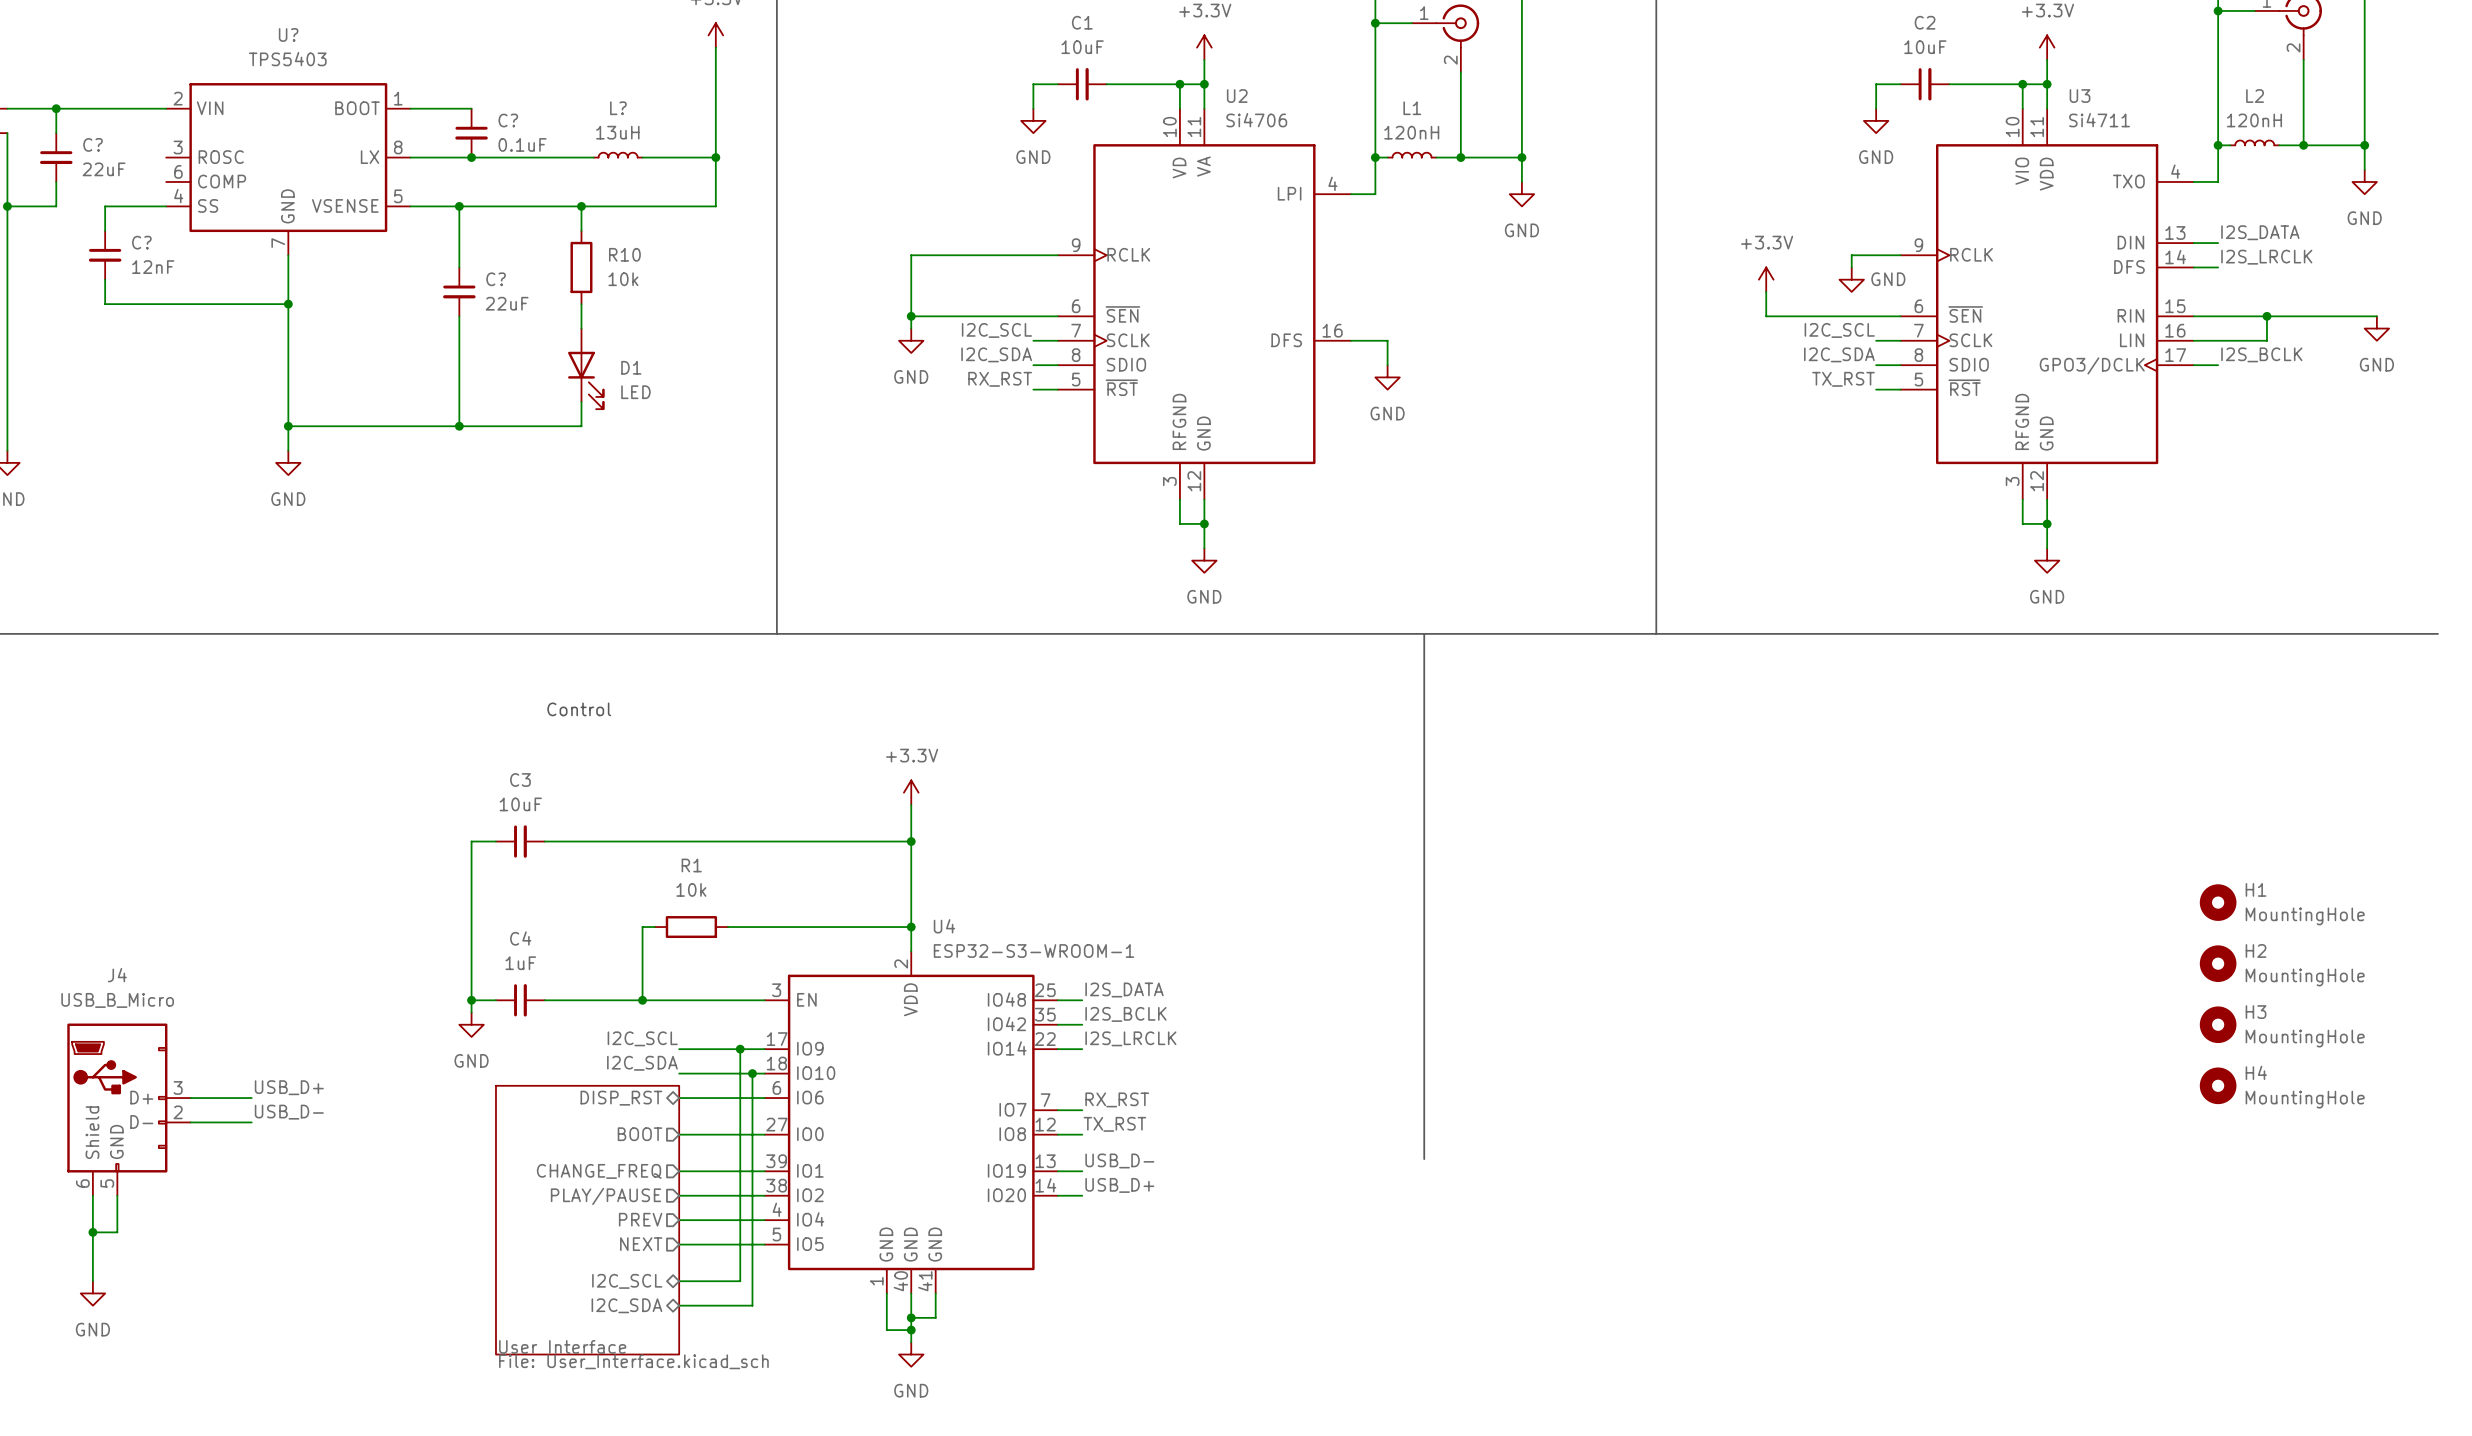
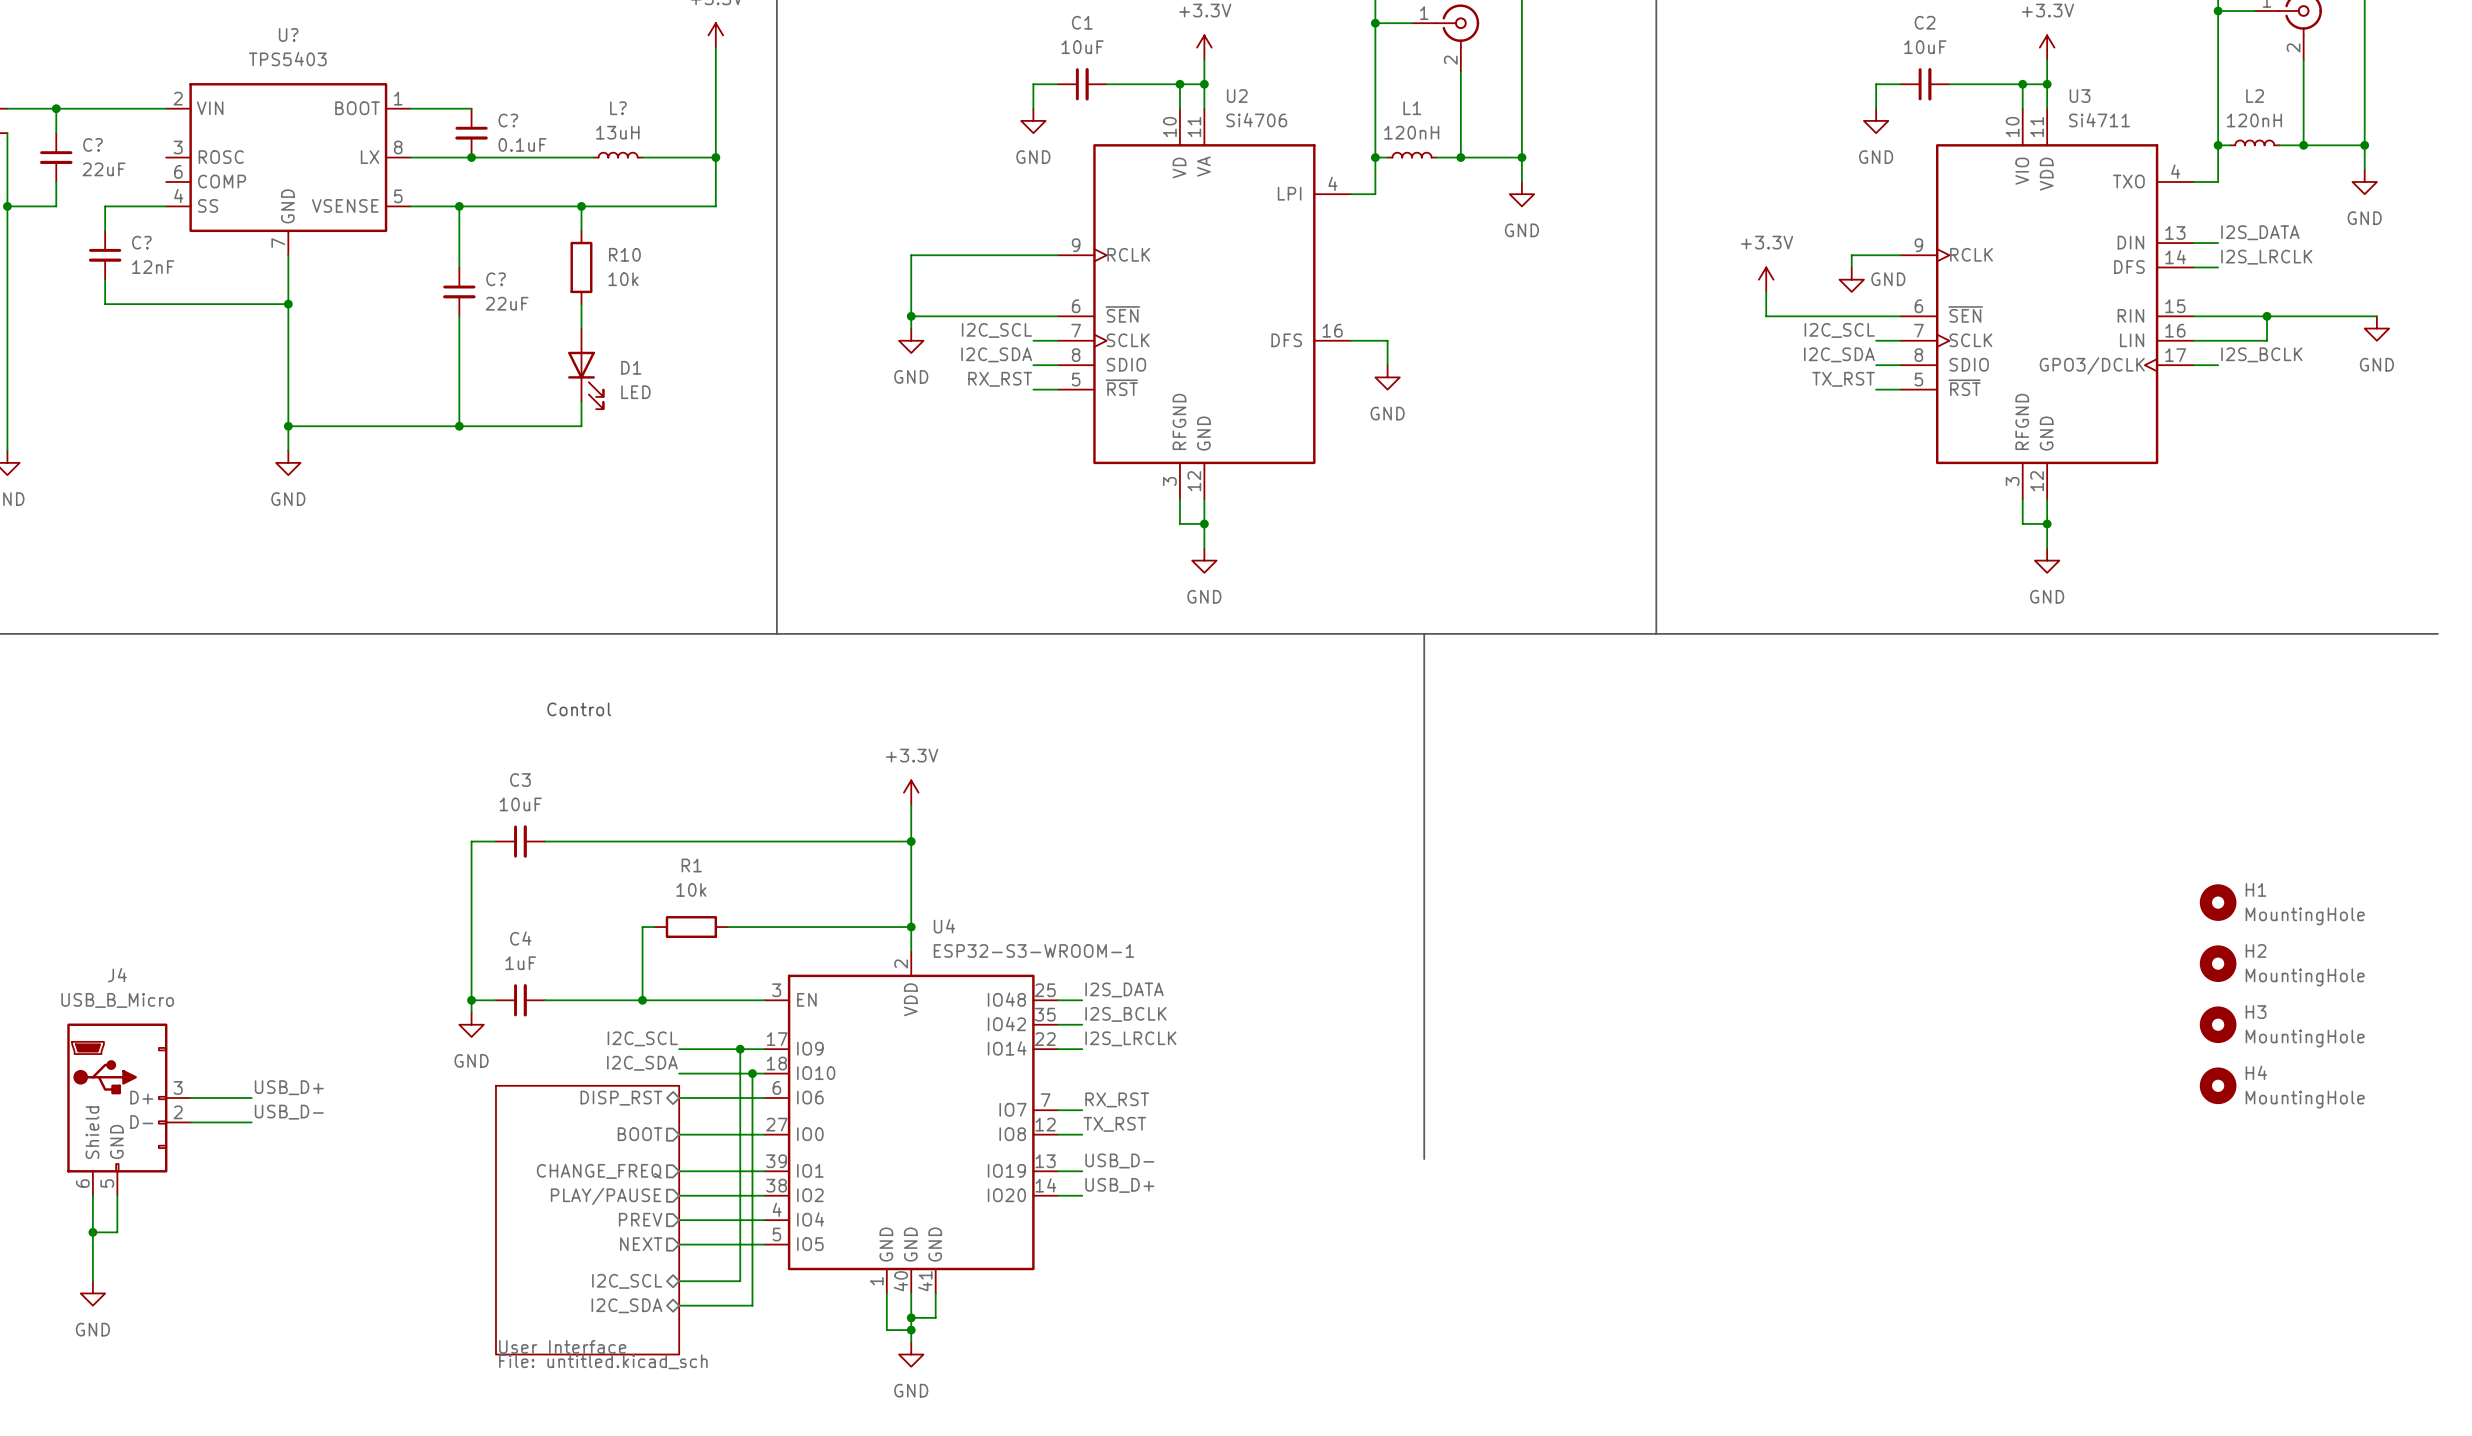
sheet User Interface value: File: User_Interface.kicad_sch (633, 1361) -> File: untitled.kicad_sch (603, 1361)

